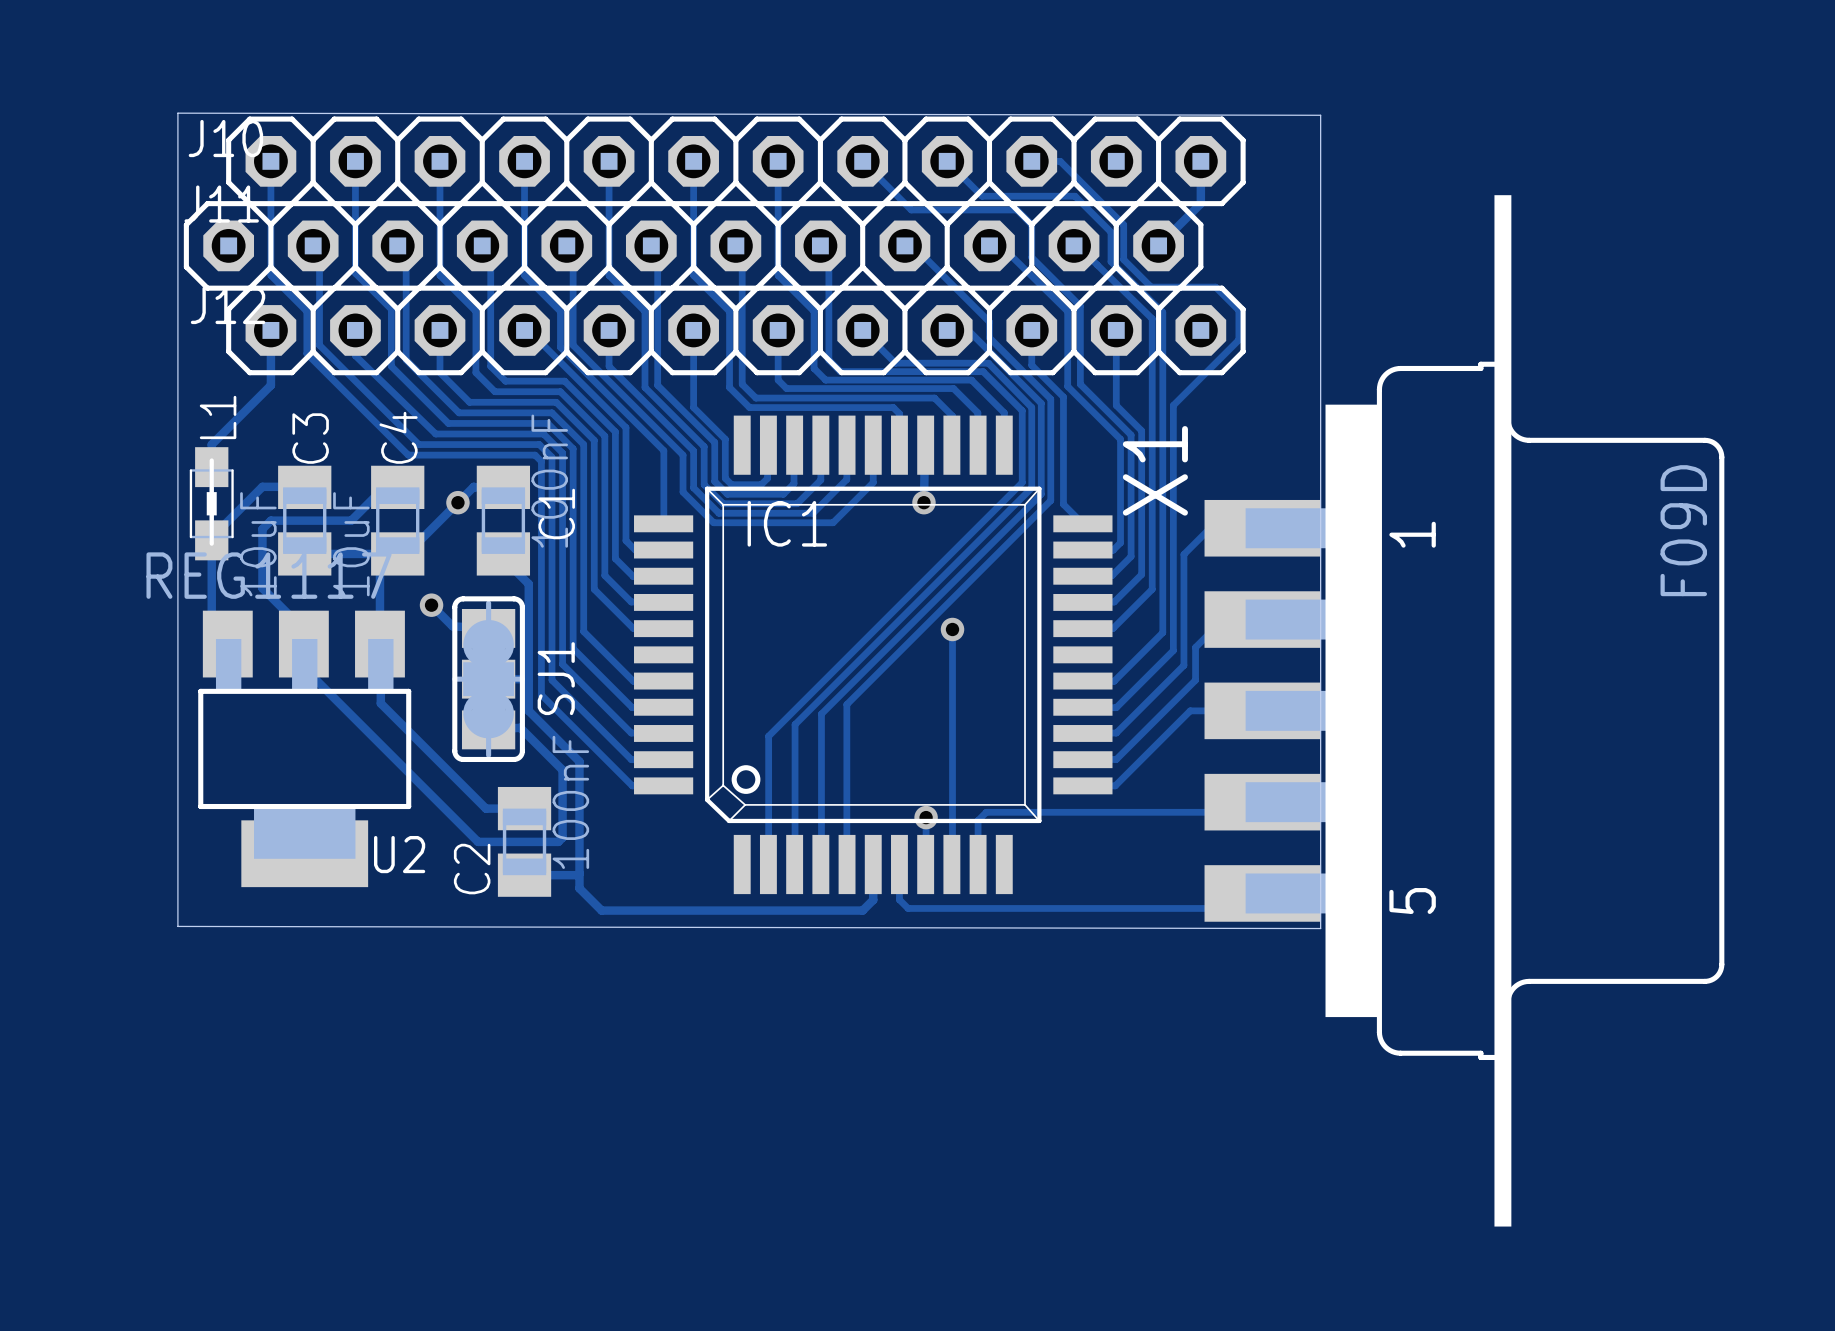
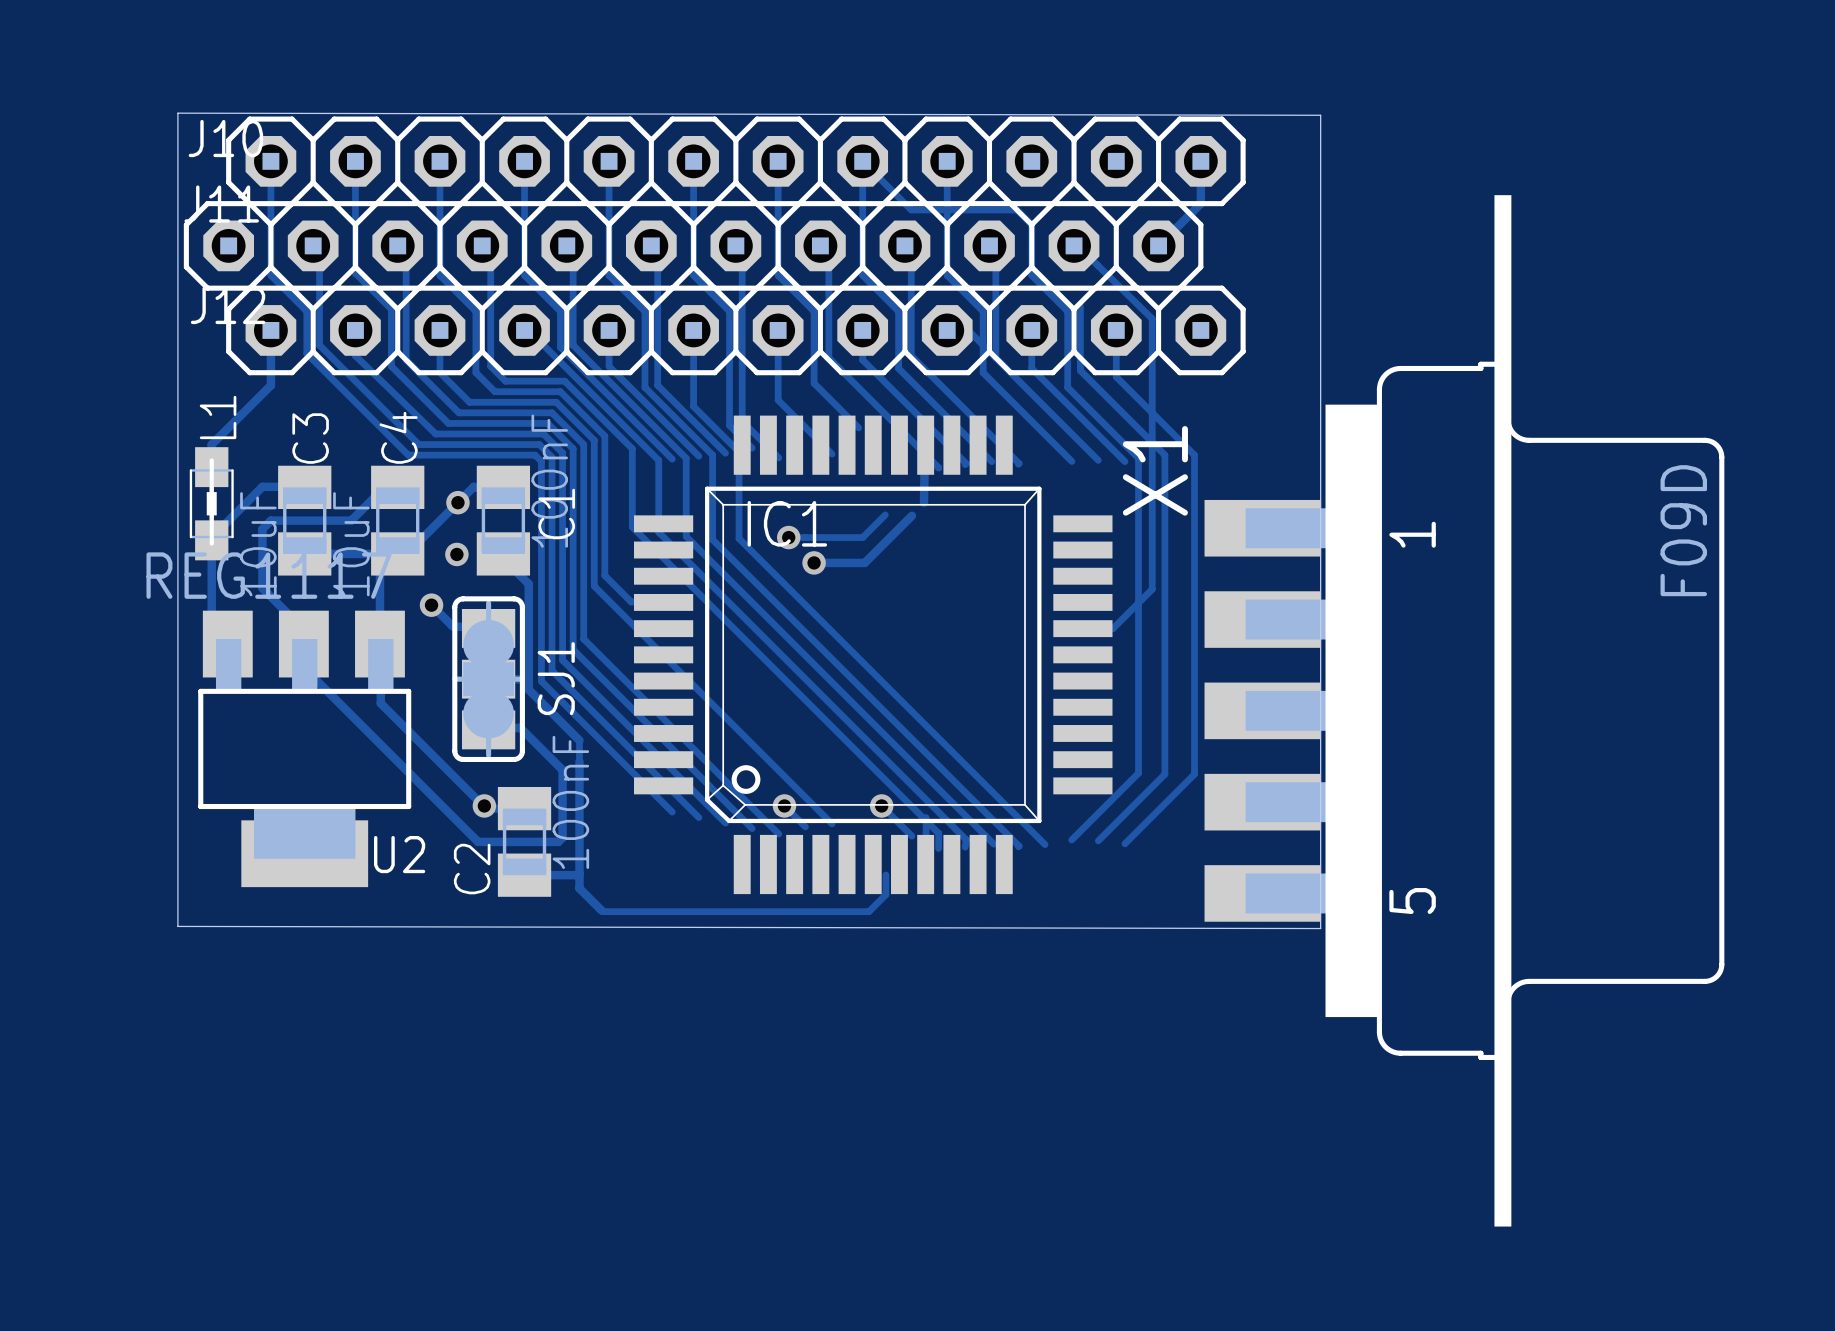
track: none -> (862, 161) (862, 275) (898, 311) (898, 368) (991, 461)
track: (947, 161) (982, 196) (1075, 196) (1111, 232) (1111, 261) (1162, 312) (1162, 632) (1114, 681) (1083, 681) -> (947, 161) (947, 275) (983, 311) (983, 372) (1071, 461)
track: (1031, 161) (1060, 161) (1123, 224) (1123, 259) (1151, 287) (1215, 287) (1238, 310) (1238, 339) (1173, 405) (1173, 650) (1116, 707) (1083, 707) -> none
track: (904, 245) (913, 245) (989, 321) (989, 337) (1050, 399) (1050, 500) (846, 704) (846, 864) -> (904, 245) (911, 252) (911, 355) (1018, 464)
track: (988, 245) (1001, 245) (1067, 311) -> (989, 245) (995, 252) (995, 357)
track: (1031, 257) (1080, 306) -> (1031, 257) (1031, 275) (1067, 311)
track: (862, 330) (895, 363) (988, 363) (1031, 407) (1031, 487) (795, 724) (795, 864) -> (862, 330) (862, 360) (966, 463) (965, 464)
track: (828, 357) (840, 371) (983, 371) (1022, 410) (1022, 482) (768, 736) (768, 864) -> (828, 357) (938, 467)
track: (1031, 365) (1063, 397) (1063, 504) (1082, 523) -> (1031, 365) (1031, 368) (1124, 461)
track: (814, 368) (825, 380) (971, 380) (1004, 412) (1004, 445) -> (814, 368) (814, 383) (858, 427)
track: (1080, 370) (1080, 384) (1131, 435) (1131, 556) (1112, 575) (1082, 576) -> (1080, 370) (1164, 455) (1164, 774) (1098, 840)
track: (1116, 376) (1116, 405) (1141, 430) (1141, 574) (1114, 602) (1083, 602) -> (1116, 376) (1194, 455) (1194, 774) (1124, 843)
track: (778, 380) (786, 388) (953, 388) (977, 412) (977, 444) -> (778, 380) (778, 400) (832, 454)
track: (742, 384) (755, 398) (934, 398) (952, 416) (951, 445) -> (742, 384) (742, 421) (778, 457)
track: (1067, 386) (1120, 439) (1120, 542) (1113, 550) (1083, 550) -> (1067, 386) (1138, 458) (1138, 773) (1071, 840)
track: (729, 387) (749, 407) (893, 407) (899, 413) (899, 444) -> (729, 387) (729, 425) (752, 448)
track: (1041, 403) (1041, 494) (821, 714) (820, 864) -> (1041, 403) (1098, 460)
track: (693, 406) (725, 439) (725, 478) (731, 484) (761, 484) (767, 478) (768, 445) -> (693, 406) (739, 451) (739, 538) (1045, 844)
track: (625, 427) (625, 540) (635, 550) (663, 550) -> (625, 427) (658, 460) (658, 532) (966, 839) (965, 847)
track: (615, 431) (615, 558) (633, 576) (663, 576) -> (615, 431) (632, 448) (632, 526) (938, 833) (938, 848)
track: (714, 442) (714, 481) (727, 494) (783, 494) (794, 483) (794, 445) -> (714, 442) (725, 453)
track: (820, 445) (820, 480) (797, 503) (723, 503) (704, 484) (704, 446) -> (1018, 846) (712, 539) (712, 455) (704, 446)
track: (846, 445) (846, 479) (813, 513) (718, 513) (693, 487) (693, 450) -> (698, 456) (693, 450)
track: (873, 445) (873, 482) (833, 522) (713, 522) (683, 492) (683, 455) -> (993, 844) (686, 536) (686, 458) (683, 455)
track: (663, 450) (663, 523) -> (663, 450) (672, 459)
via: (923, 502) -> none
track: none -> (885, 514) (862, 537) (788, 537)
track: none -> (911, 515) (864, 562) (814, 562)
track: (1262, 528) (1210, 528) (1183, 554) (1183, 665) (1116, 733) (1083, 733) -> none
via: none -> (788, 537)
via: none -> (456, 554)
via: none -> (814, 562)
track: (594, 586) (594, 589) (633, 628) (663, 628) -> (594, 586) (832, 823)
track: (1262, 619) (1223, 619) (1195, 647) (1195, 680) (1116, 759) (1083, 759) -> none
track: (952, 629) (951, 864) -> none
via: (952, 629) -> none
track: (583, 631) (633, 681) (663, 681) -> (583, 631) (583, 639) (778, 834)
track: (573, 648) (632, 707) (663, 707) -> (573, 648) (752, 828)
track: (562, 660) (562, 664) (631, 733) (663, 733) -> (562, 660) (725, 823)
track: (552, 670) (552, 680) (631, 759) (663, 759) -> (552, 670) (698, 817)
track: (541, 681) (541, 695) (632, 785) (663, 785) -> (541, 681) (672, 812)
track: (528, 689) (528, 710) (579, 761) -> (528, 689) (579, 740) (579, 761)
track: (1262, 710) (1190, 710) (1115, 785) (1082, 785) -> none
track: (1262, 802) (1252, 812) (986, 812) (978, 820) (978, 864) -> none
via: none -> (484, 805)
track: none -> (784, 805) (805, 826)
via: none -> (784, 805)
track: none -> (881, 805) (911, 836)
via position: (926, 817) -> (881, 805)
track: (873, 864) (873, 900) (862, 910) (601, 910) -> (885, 874) (885, 894) (869, 911) (601, 910)
track: (899, 864) (899, 899) (908, 908) (1247, 908) (1262, 893) -> none

